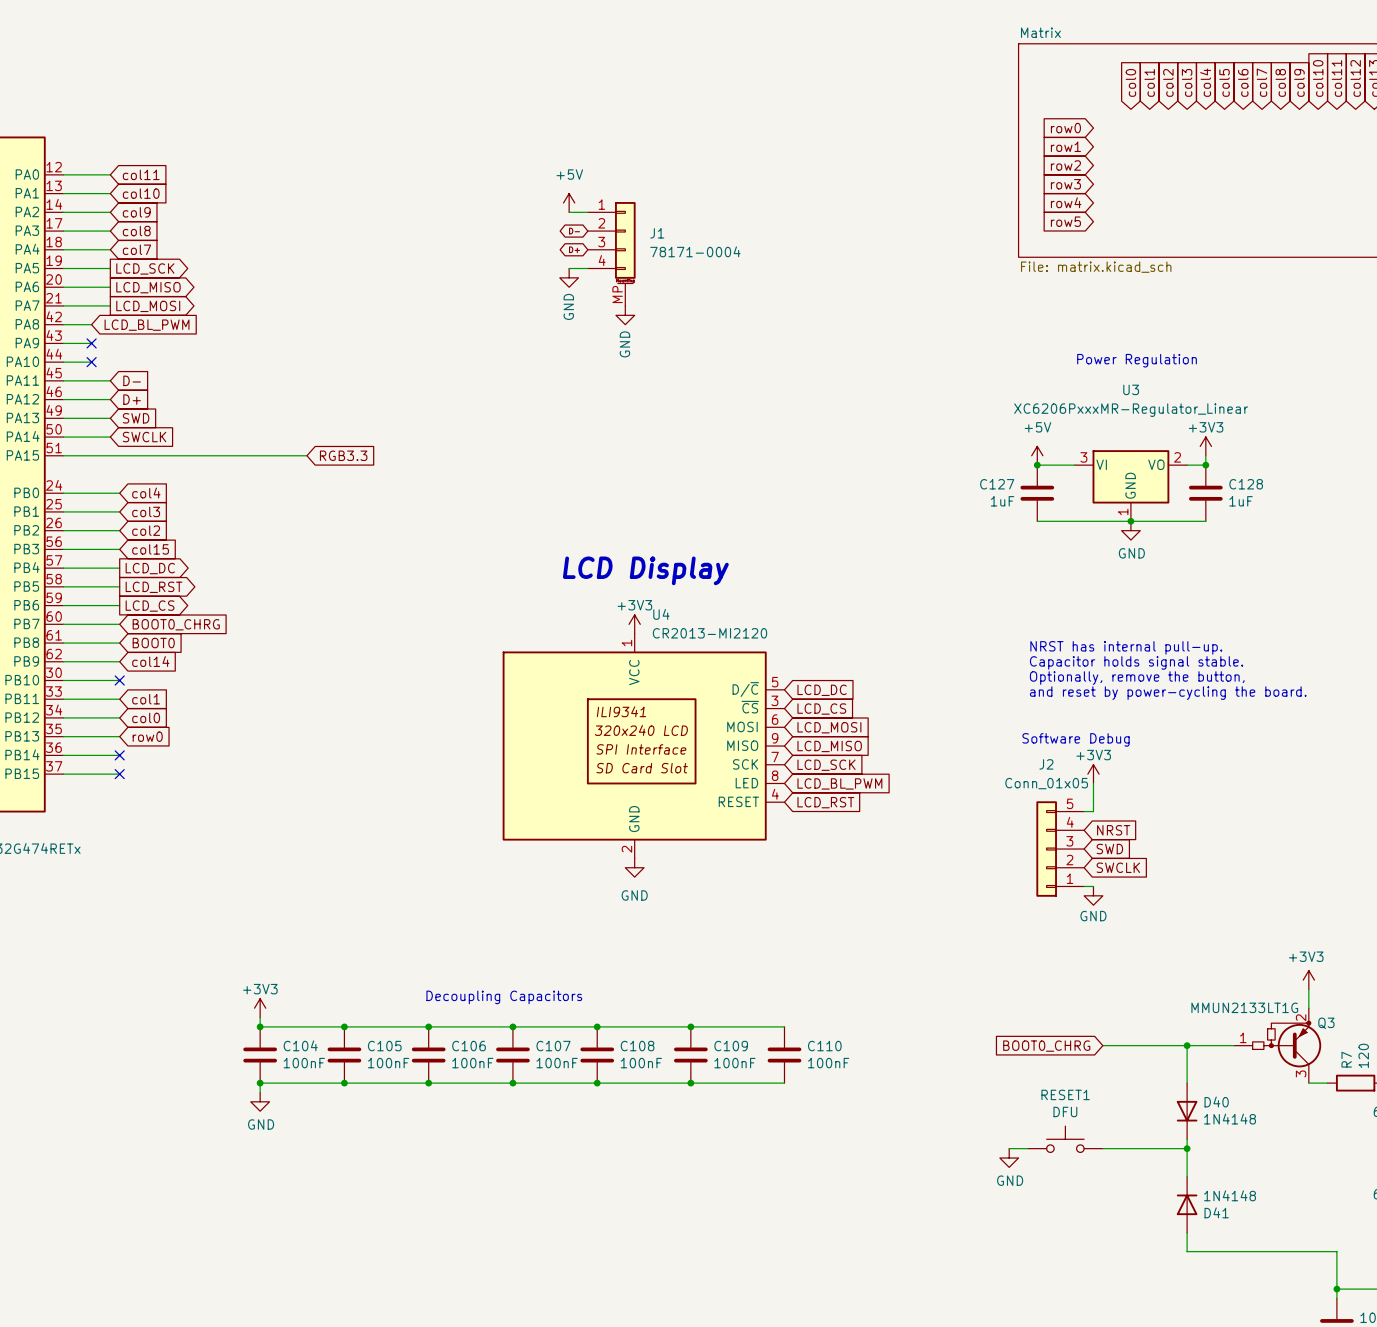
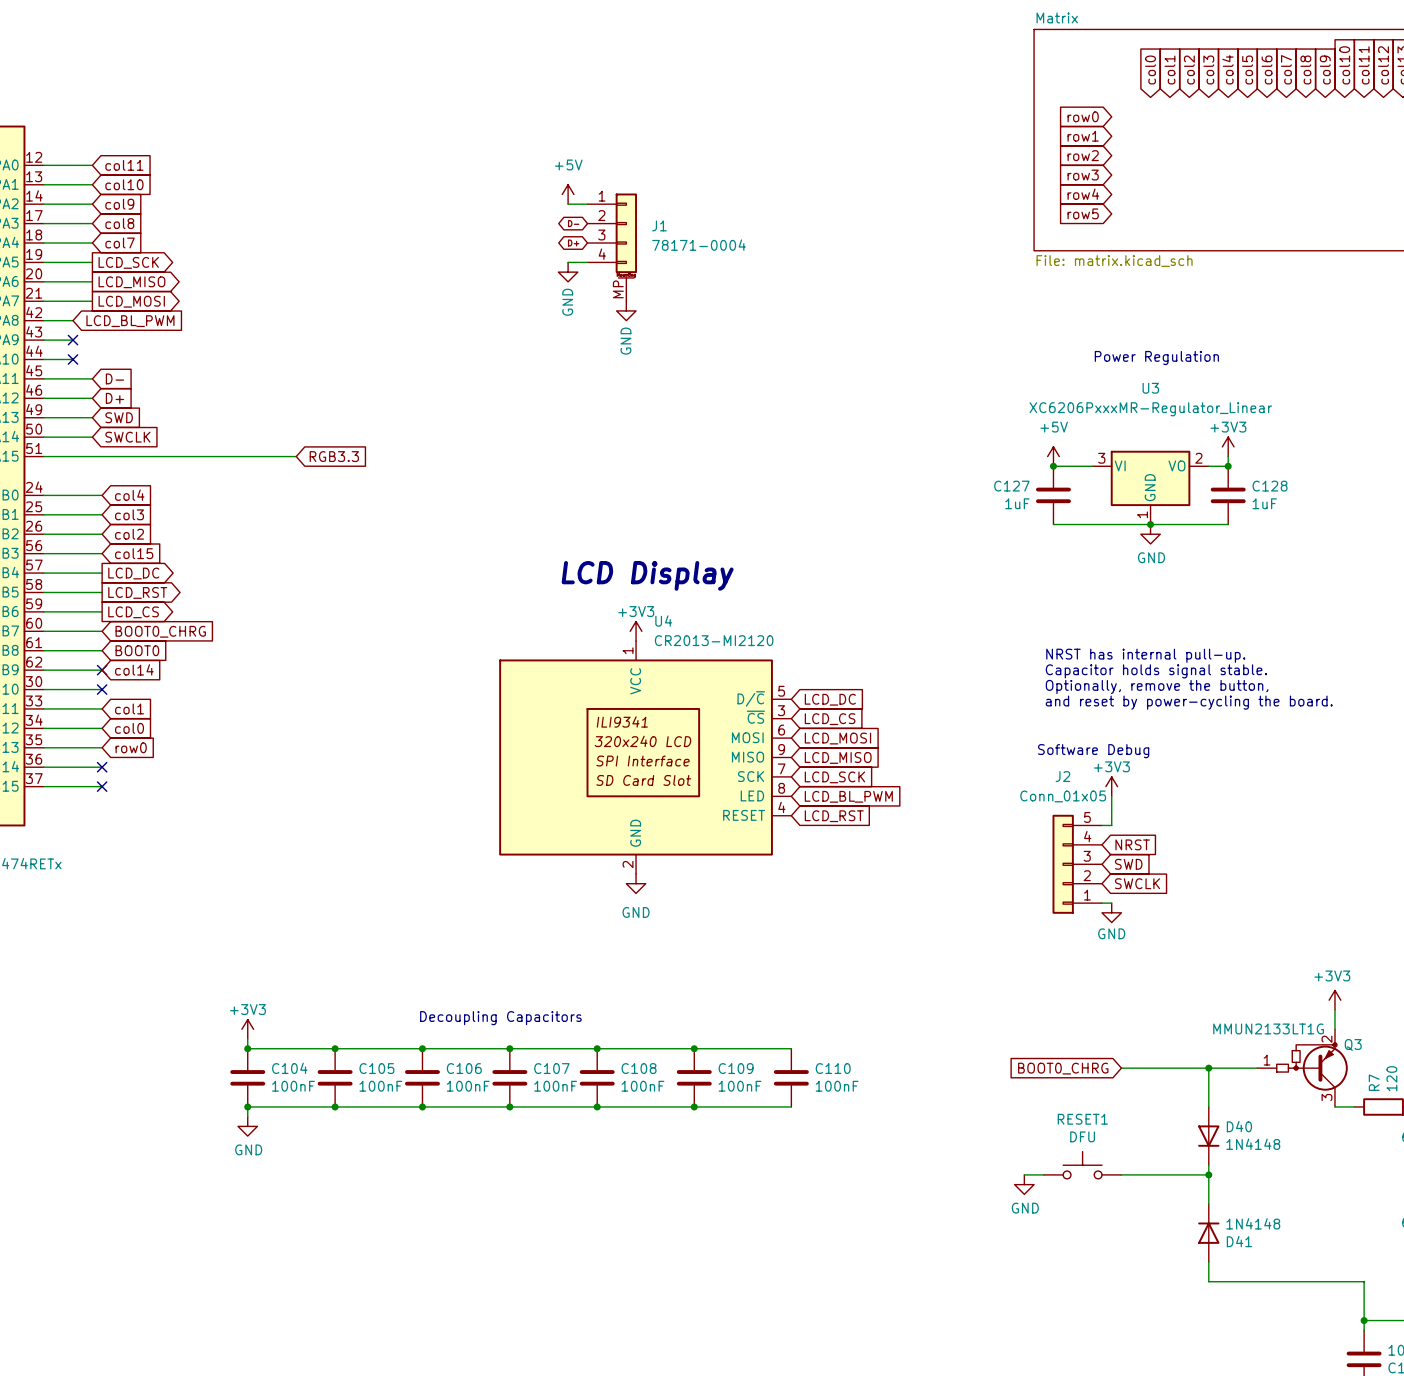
no-connect mark: none -> (102, 670)

